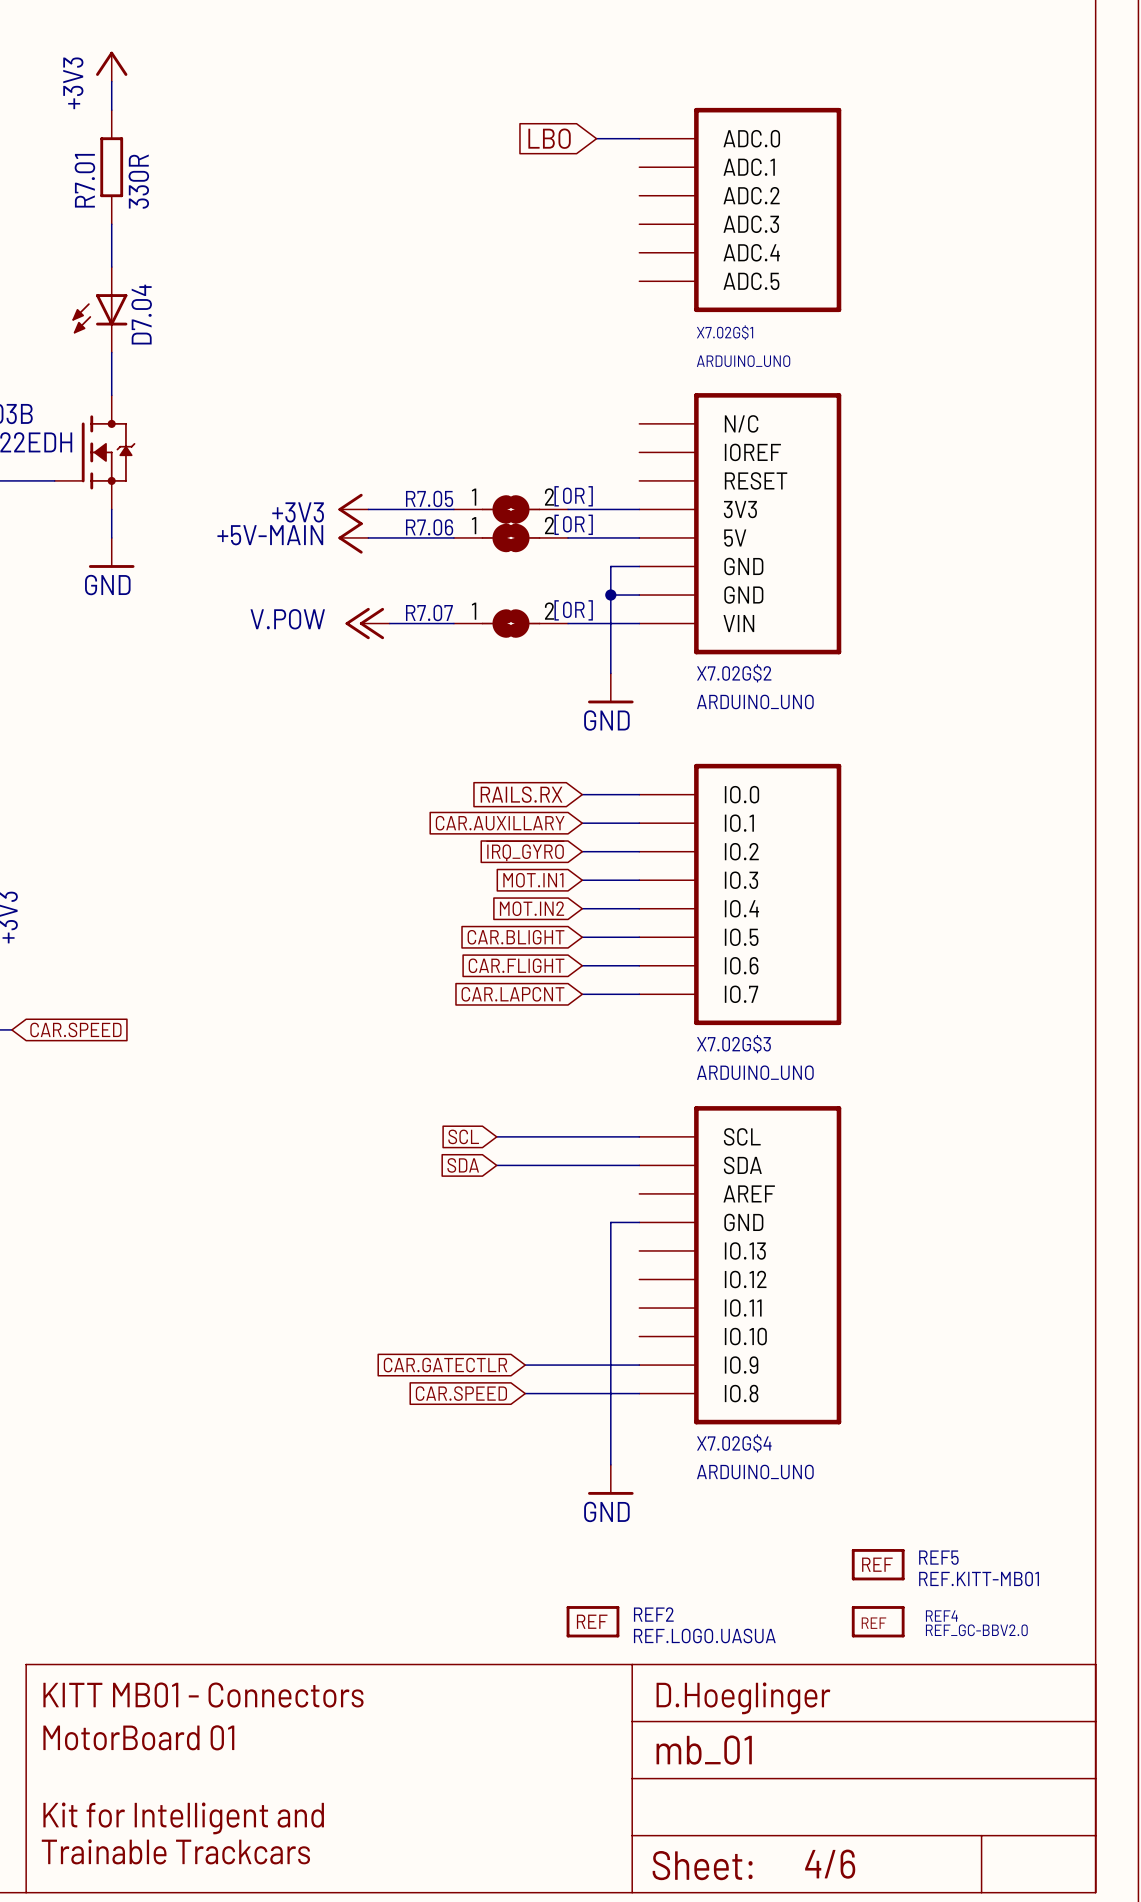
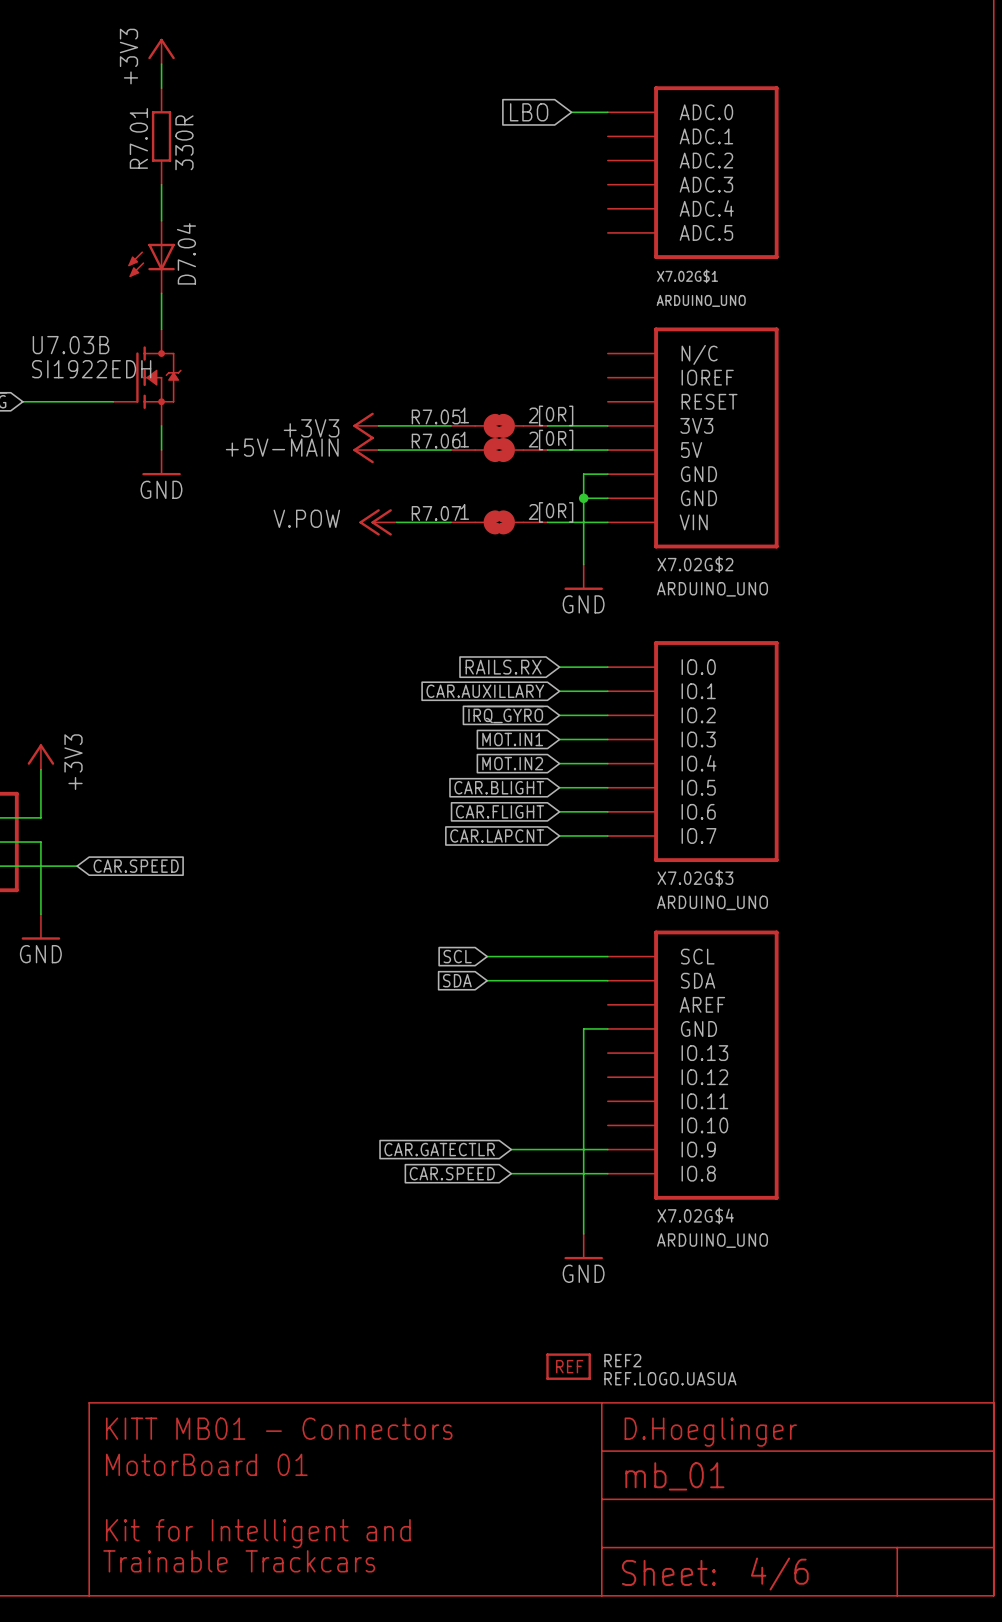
REF5: REF.KITT-MB01 (878, 1564) -> none
REF4: REF_GC-BBV2.0 (878, 1621) -> none

